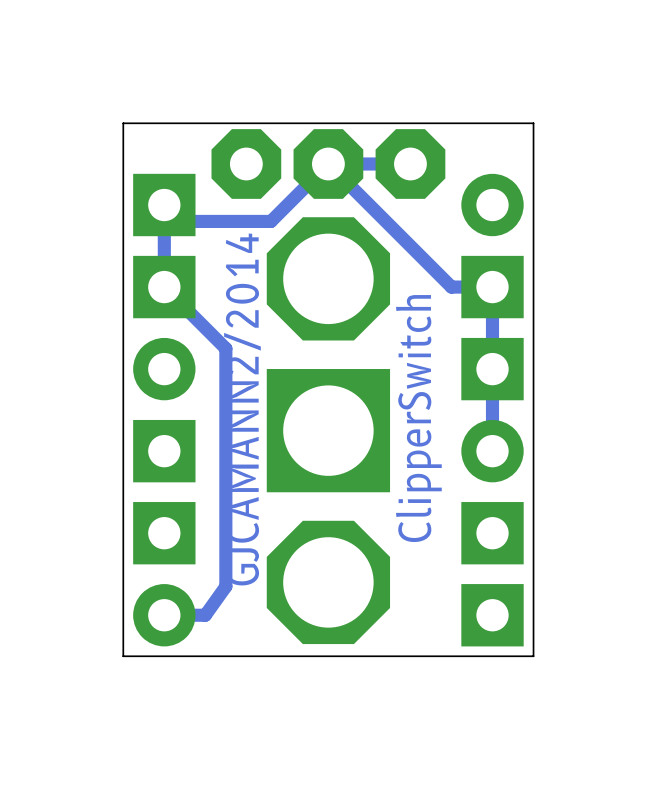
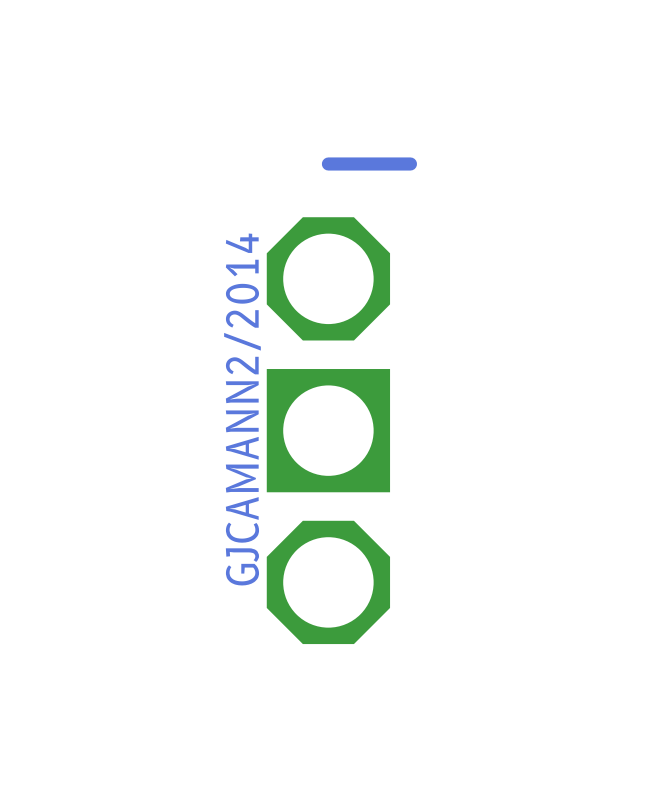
board edge: (533, 123) (123, 123) (123, 656) (533, 656) (533, 123) -> none
part: (246, 163) -> none
part: (328, 163) -> none
part: (410, 163) -> none
track: (164, 205) (164, 287) (225, 348) (225, 586) (205, 615) (164, 615) -> none
track: (164, 221) (270, 221) (328, 163) (451, 287) (492, 287) (492, 451) -> none
part: (164, 287) -> none
part: (492, 287) -> none
text: ClipperSwitch (418, 418) -> none
part: (164, 533) -> none
part: (492, 533) -> none

